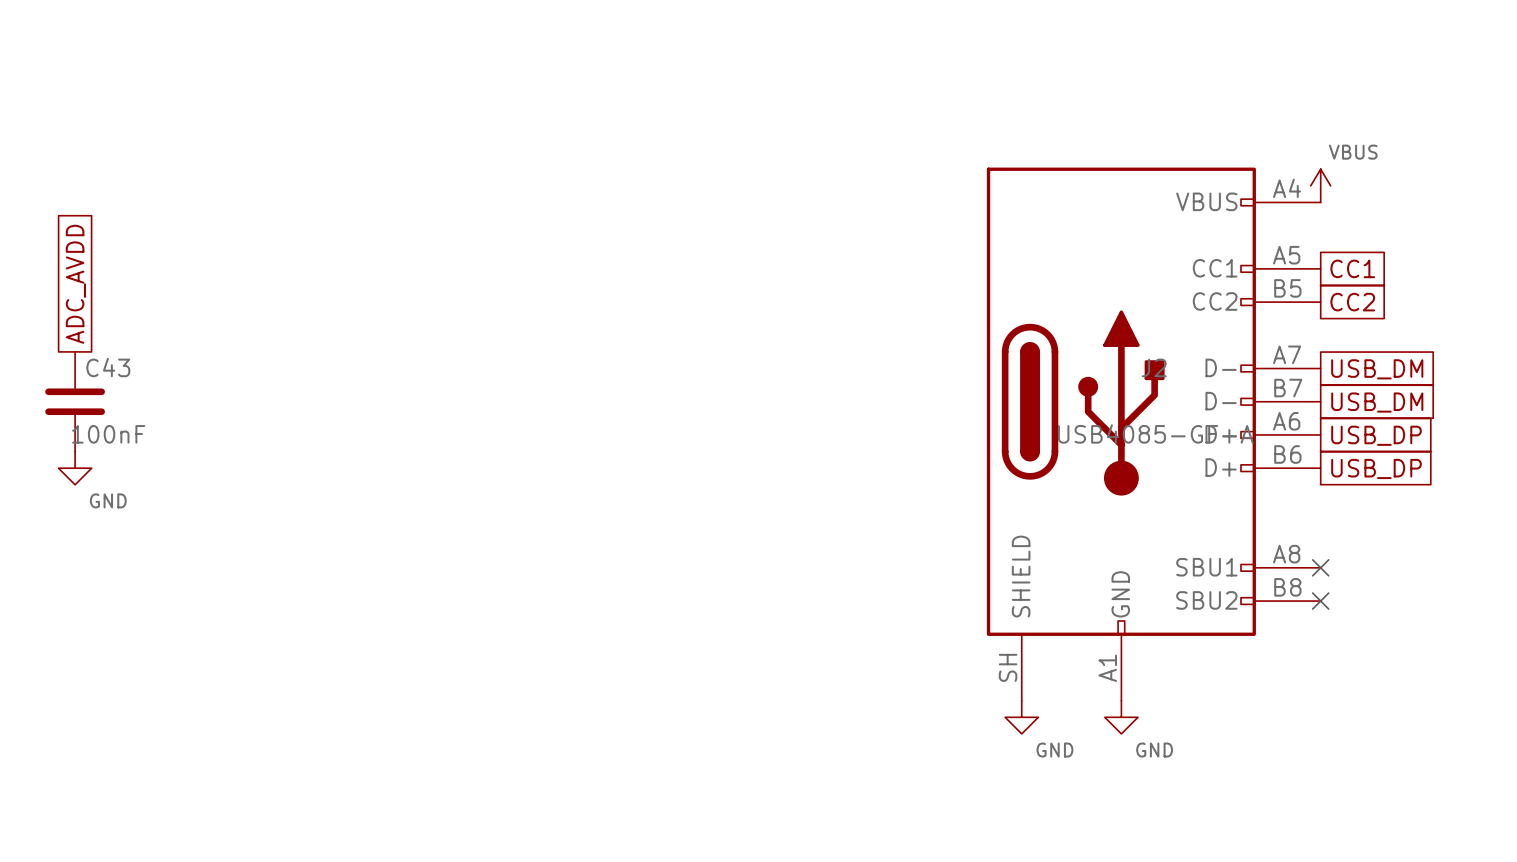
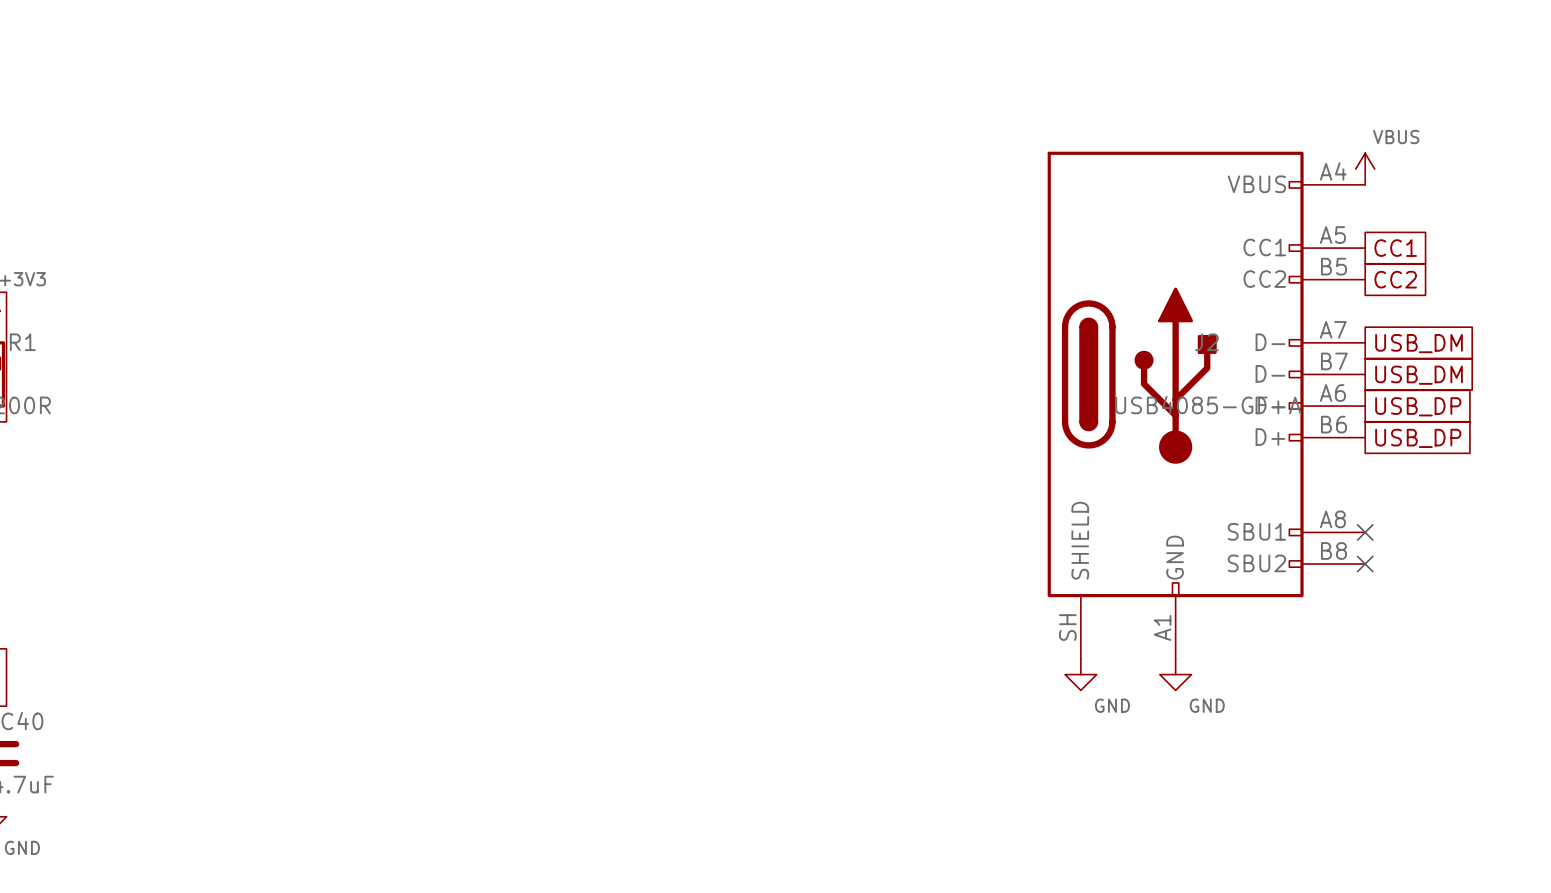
global label: ADC_AVDD (75, 284) -> none
C43: 100nF (75, 401) -> none
power symbol: GND (75, 468) -> none

